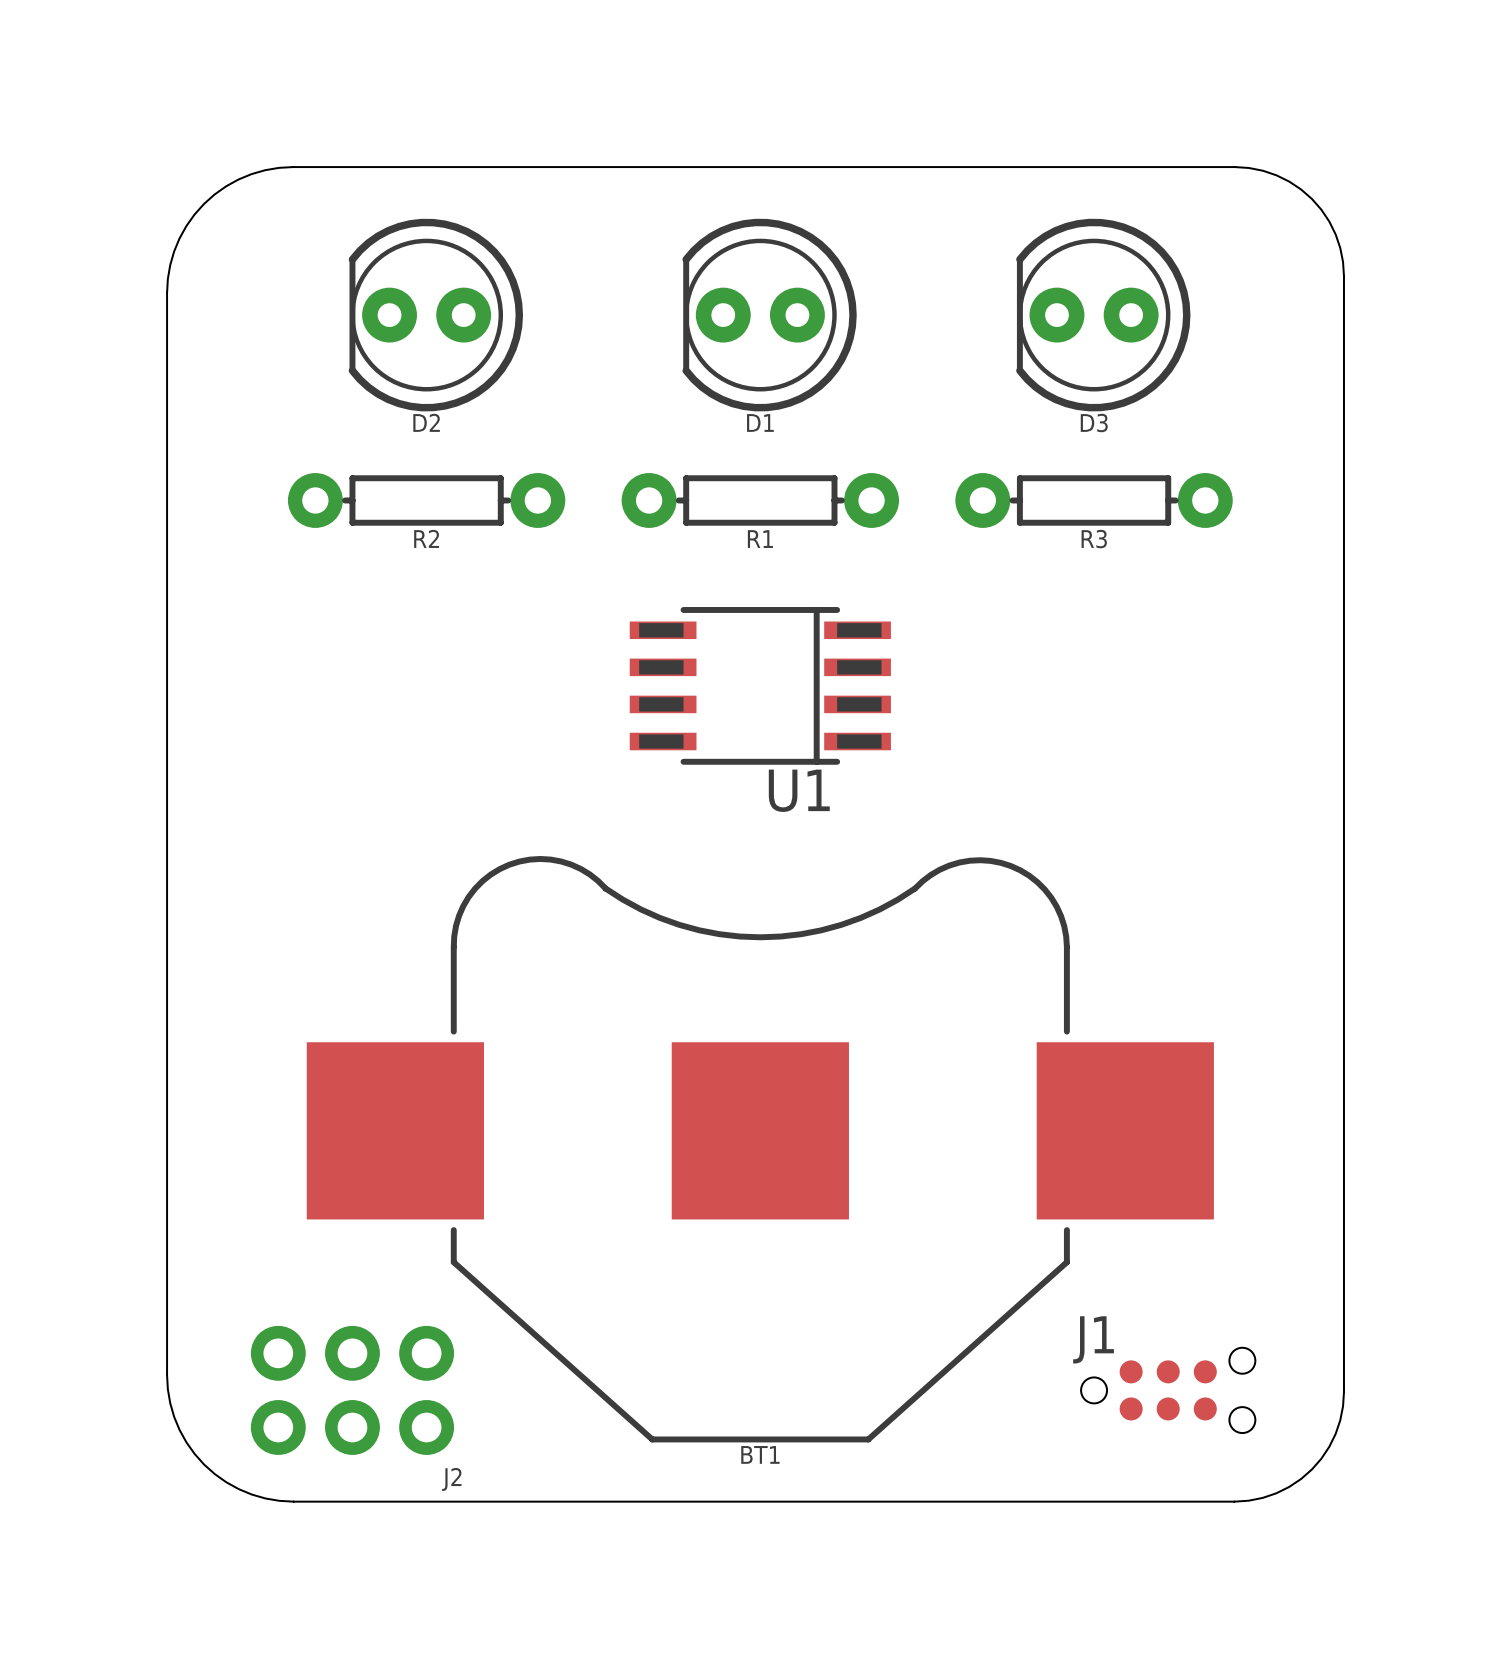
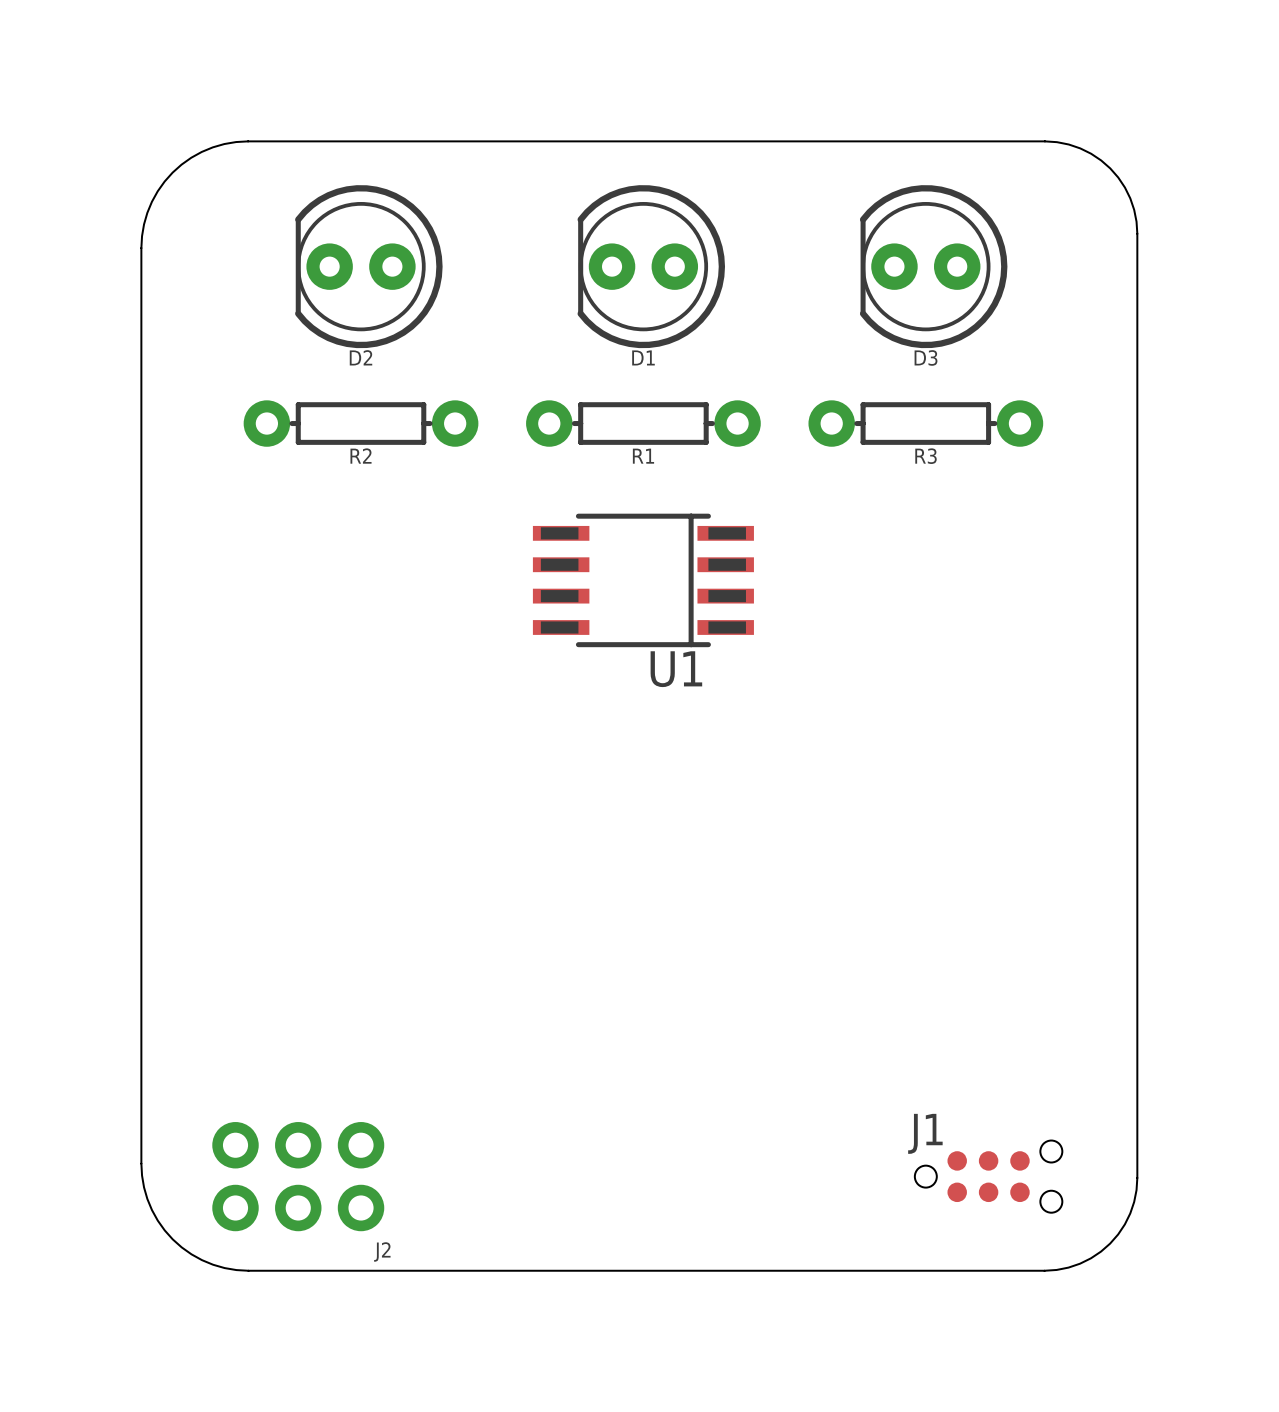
BT1: (760, 1149) -> none

